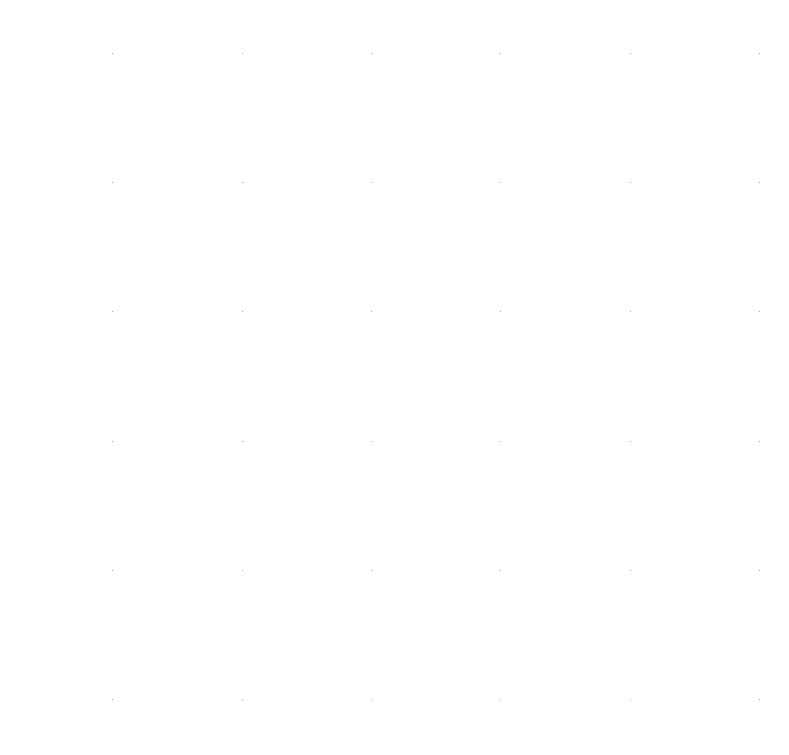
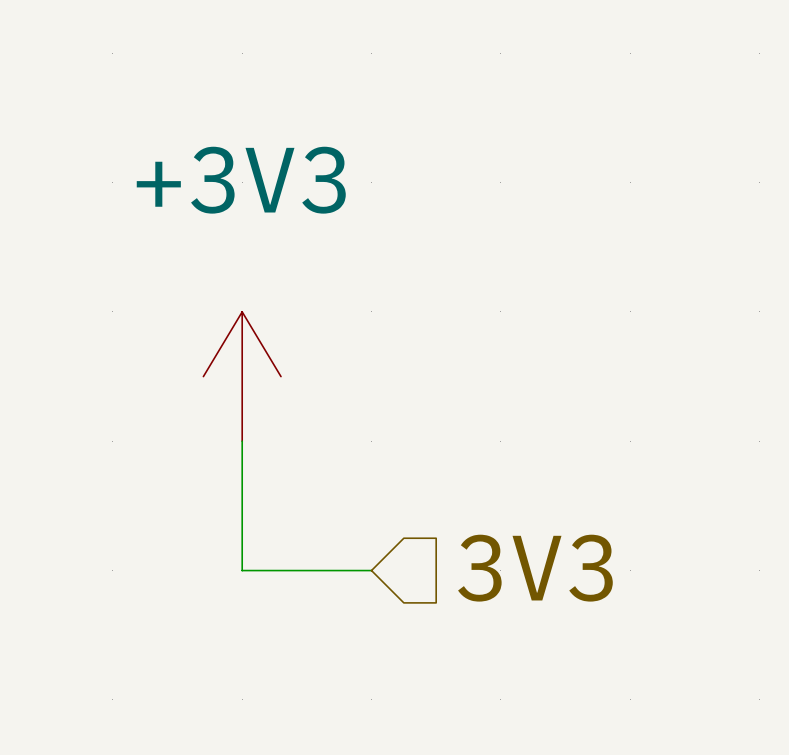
power symbol: none -> +3V3 (242, 376)
wire: none -> (242, 441) (242, 570) (371, 570)
hierarchical label: none -> 3V3 (535, 568)

